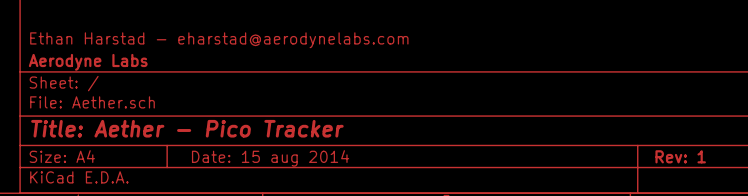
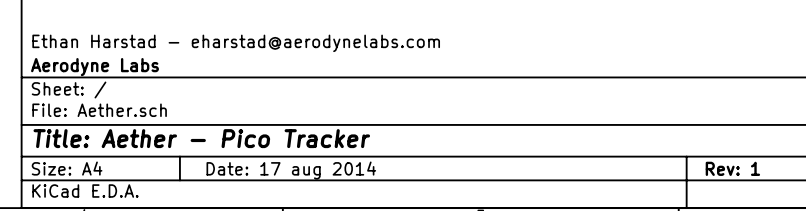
title block: Date: 15 aug 2014 (270, 158) -> Date: 17 aug 2014 (291, 170)

